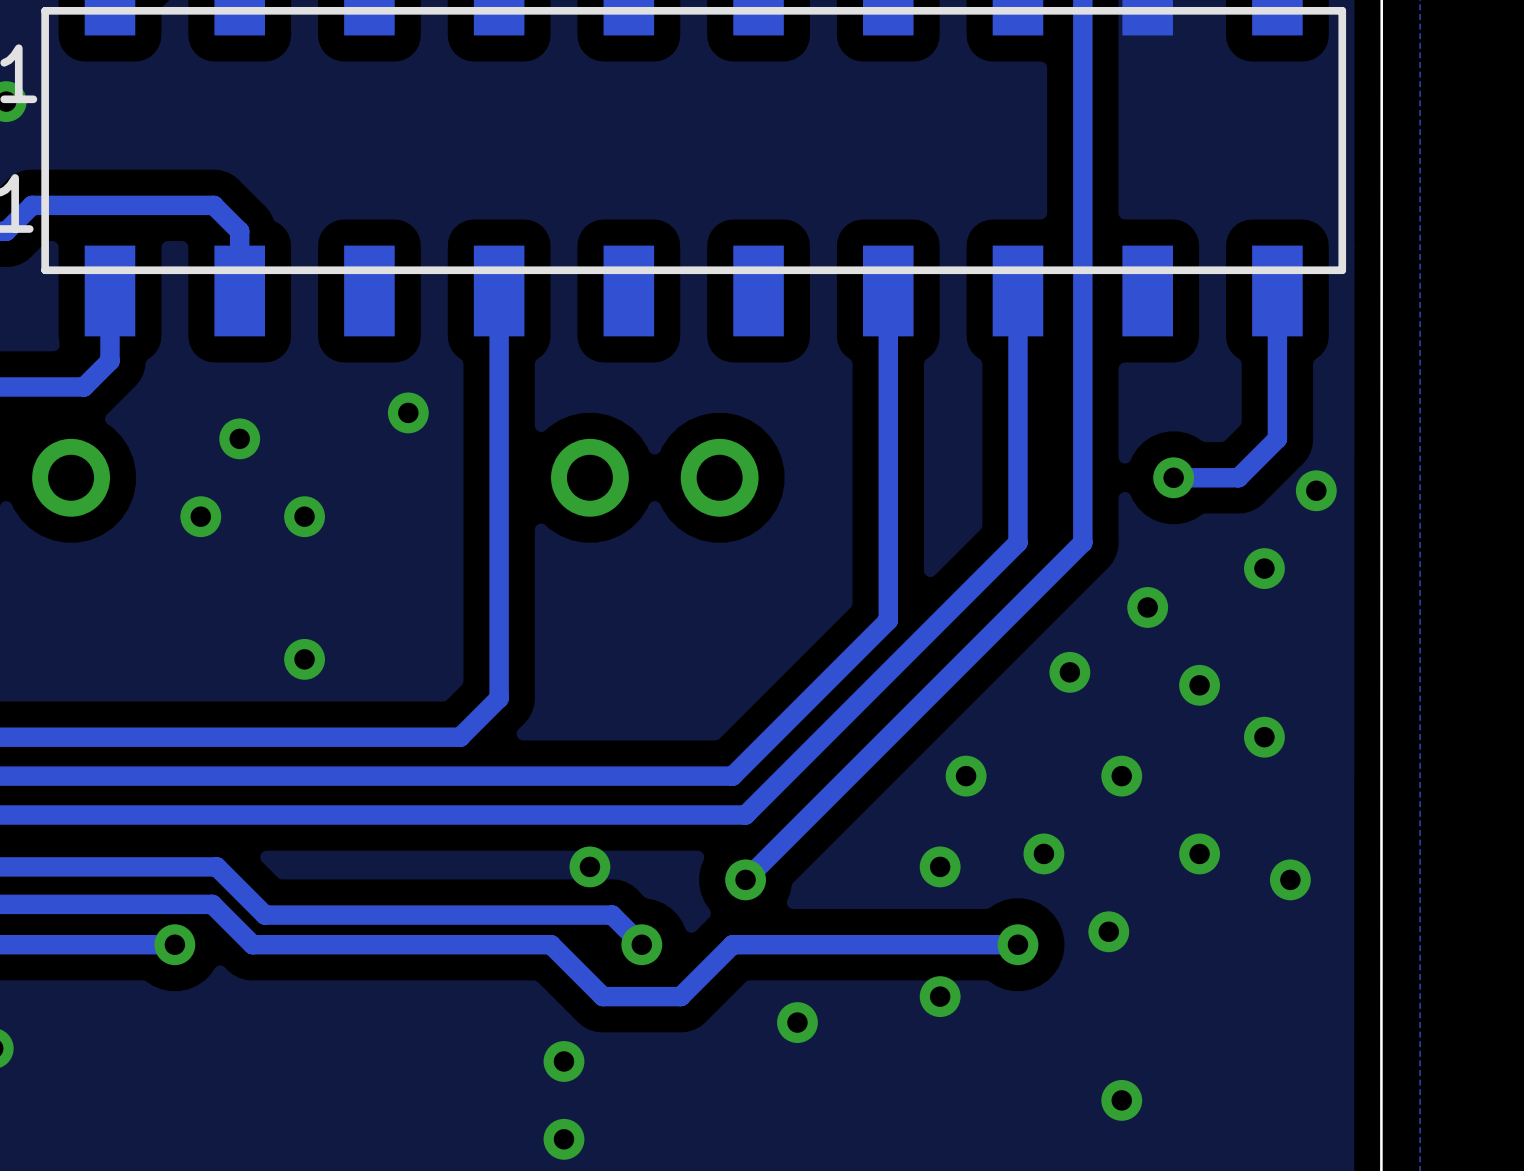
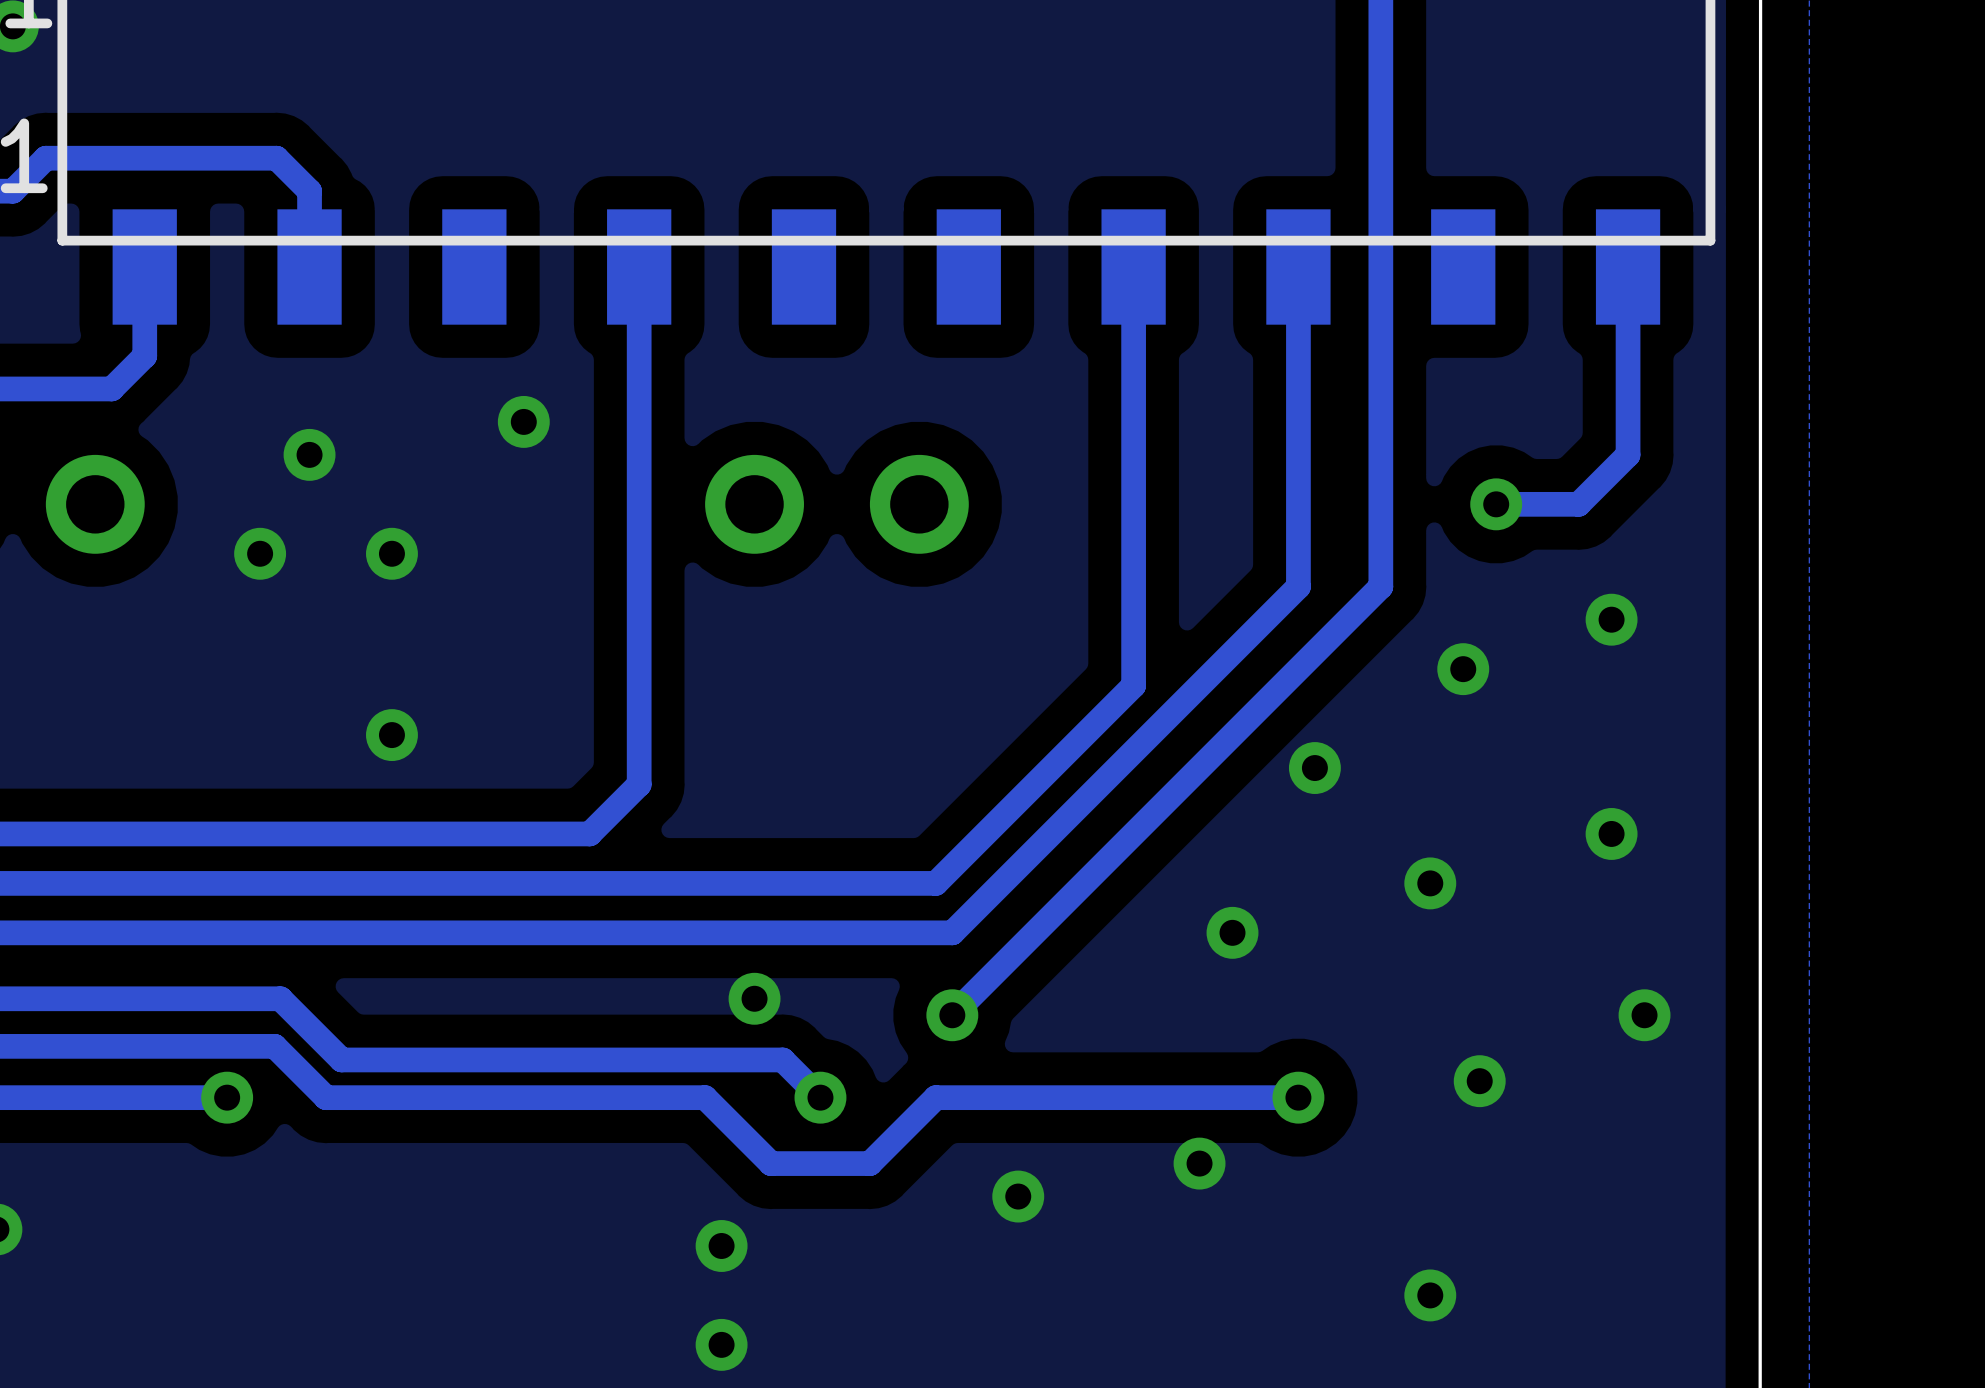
via: (1316, 490) -> none
via position: (1069, 672) -> (1314, 768)
via: (1199, 685) -> none
via position: (966, 776) -> (1232, 932)
via: (1043, 853) -> none
via: (1199, 853) -> none
via: (940, 866) -> none
via: (1108, 931) -> none
via: none -> (1479, 1081)

